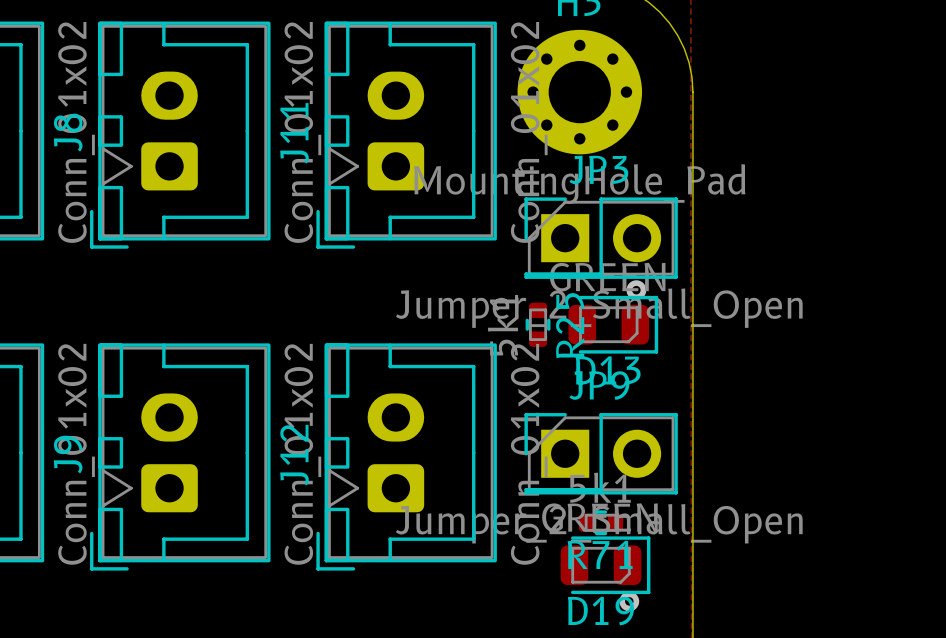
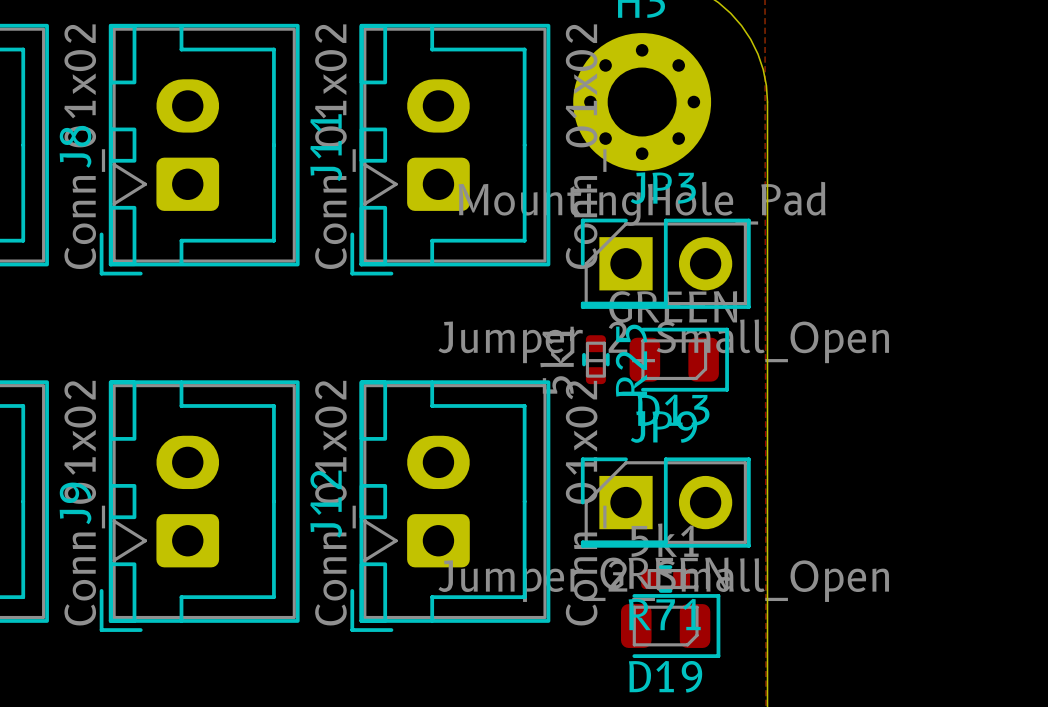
via: (636, 290) -> none
via: (629, 601) -> none

